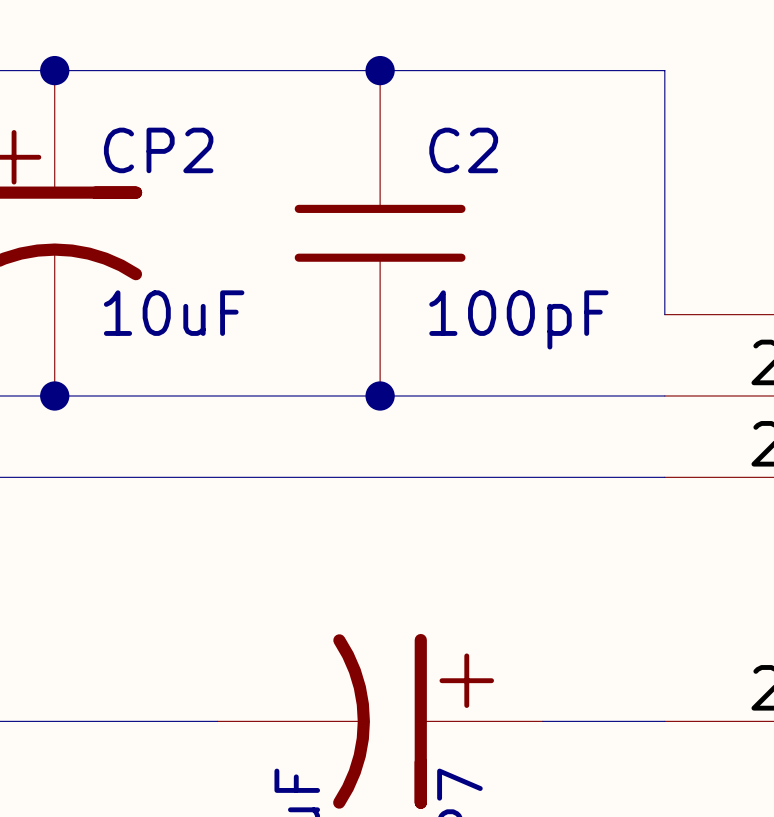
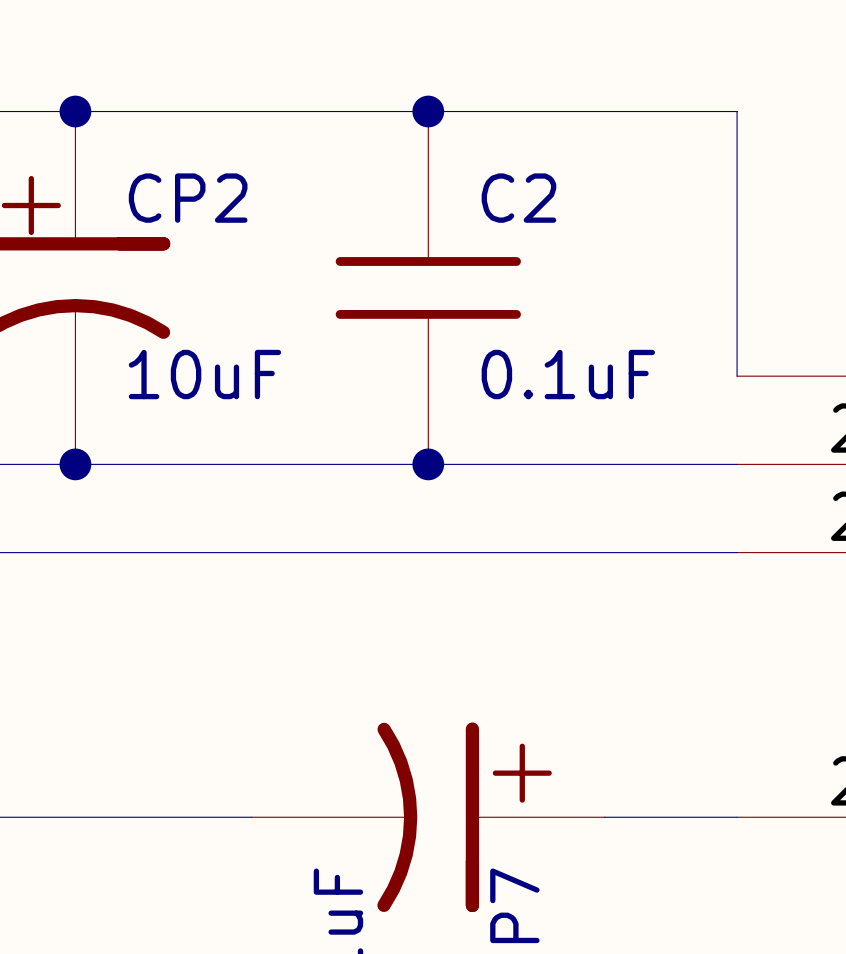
C2 value: 100pF (518, 319) -> 0.1uF (568, 374)

